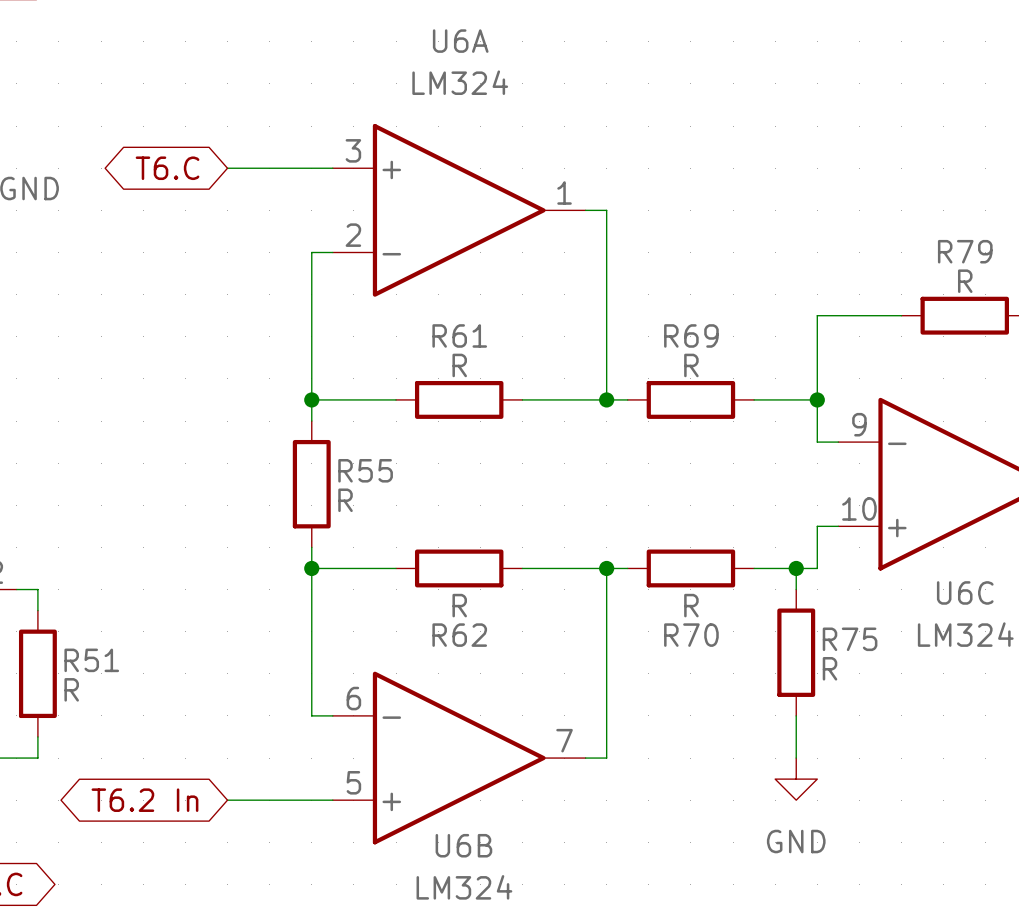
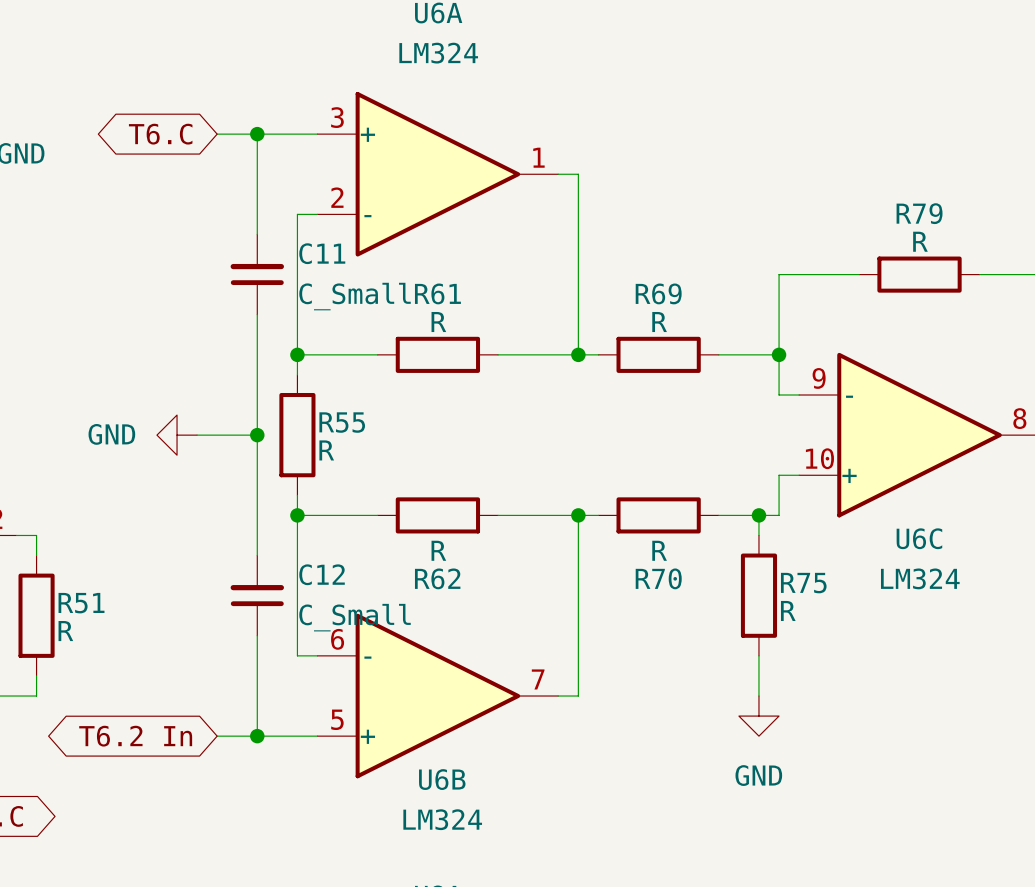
wire: none -> (257, 134) (257, 234)
junction: none -> (257, 134)
C11: none -> C_Small (257, 274)
wire: none -> (257, 314) (257, 555)
power symbol: none -> GND (177, 435)
wire: none -> (197, 435) (257, 435)
junction: none -> (257, 435)
C12: none -> C_Small (257, 595)
wire: none -> (257, 635) (257, 736)
junction: none -> (257, 736)

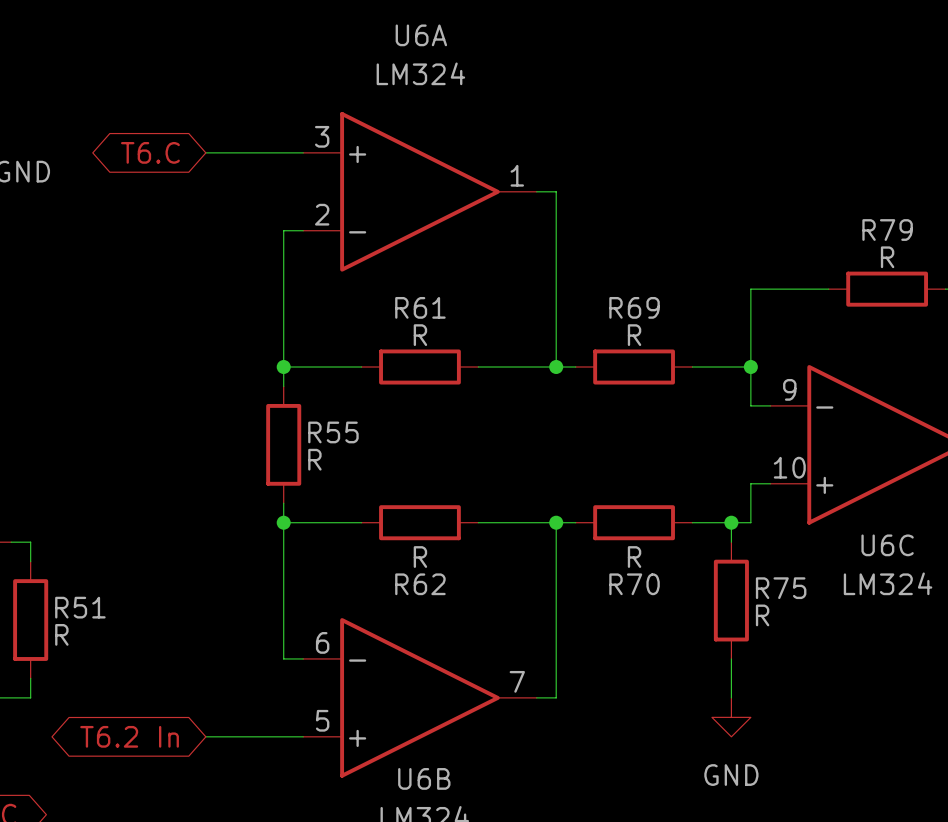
wire: (257, 134) (257, 234) -> none
junction: (257, 134) -> none
C11: C_Small (257, 274) -> none
wire: (257, 314) (257, 555) -> none
power symbol: GND (177, 435) -> none
wire: (197, 435) (257, 435) -> none
junction: (257, 435) -> none
C12: C_Small (257, 595) -> none
wire: (257, 635) (257, 736) -> none
junction: (257, 736) -> none

